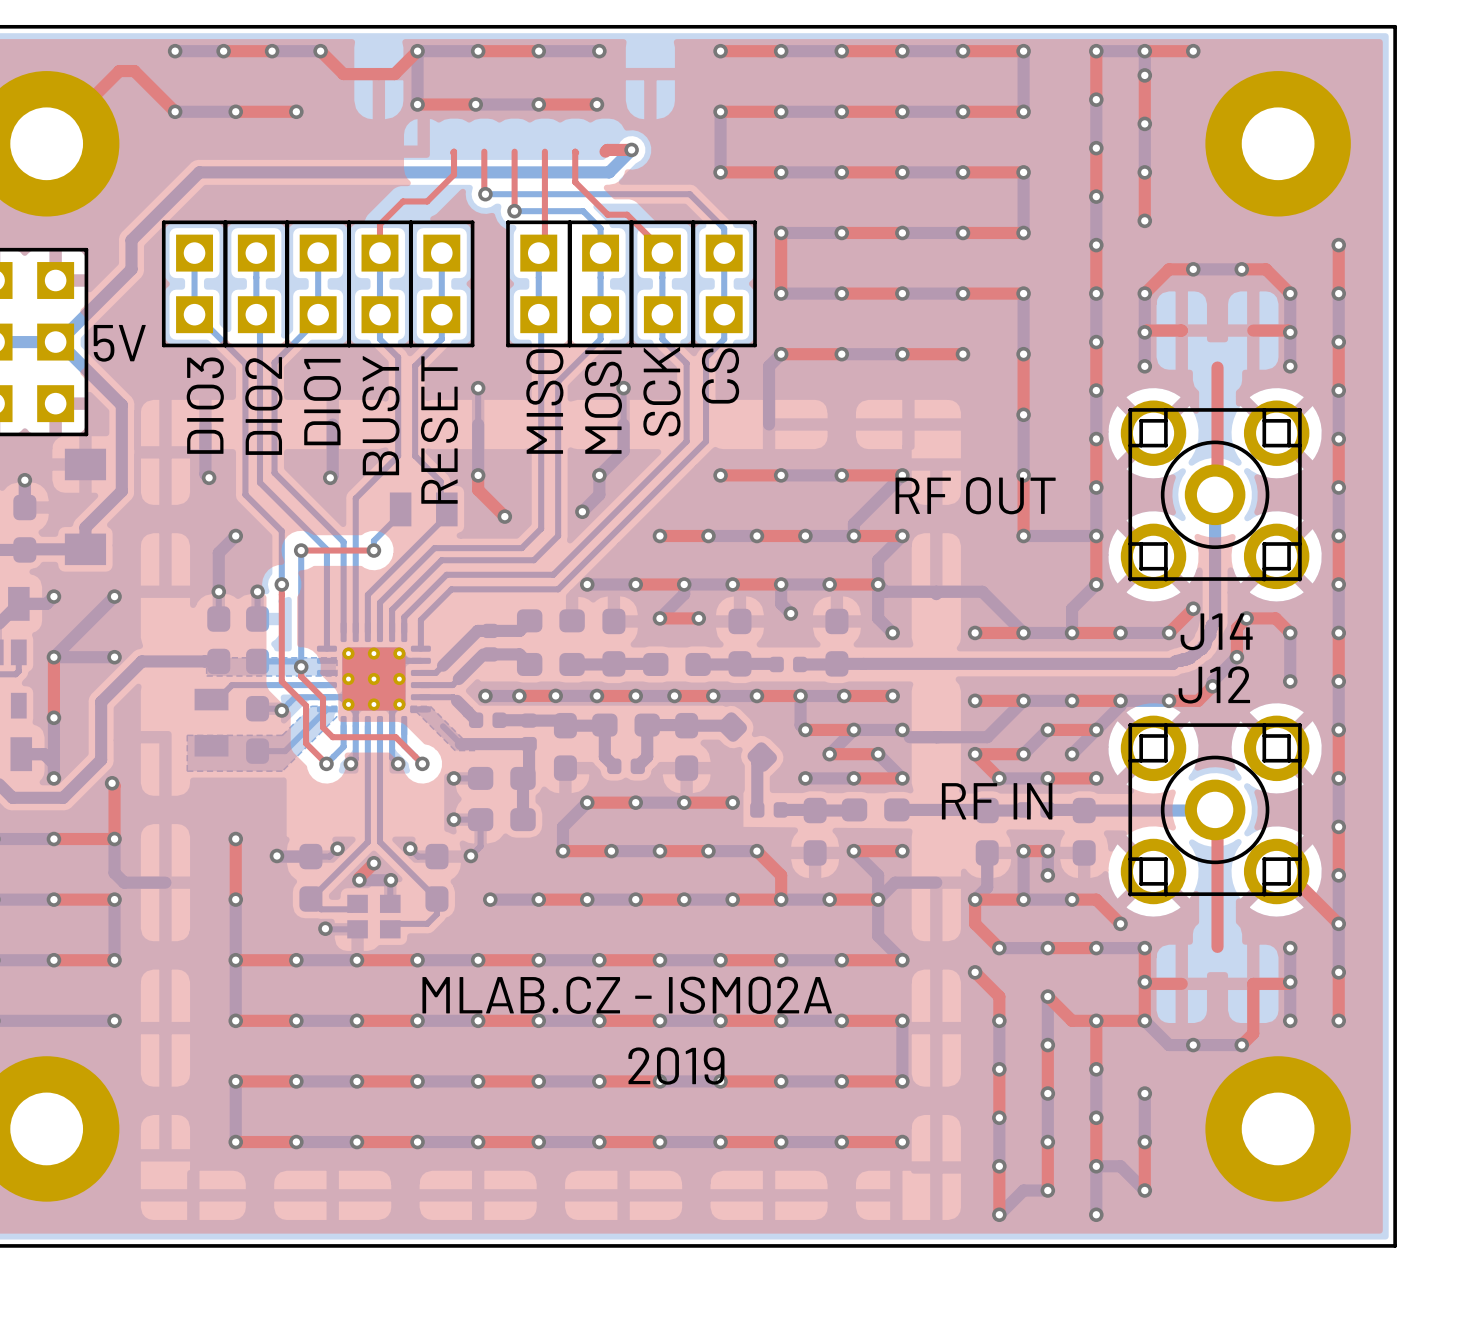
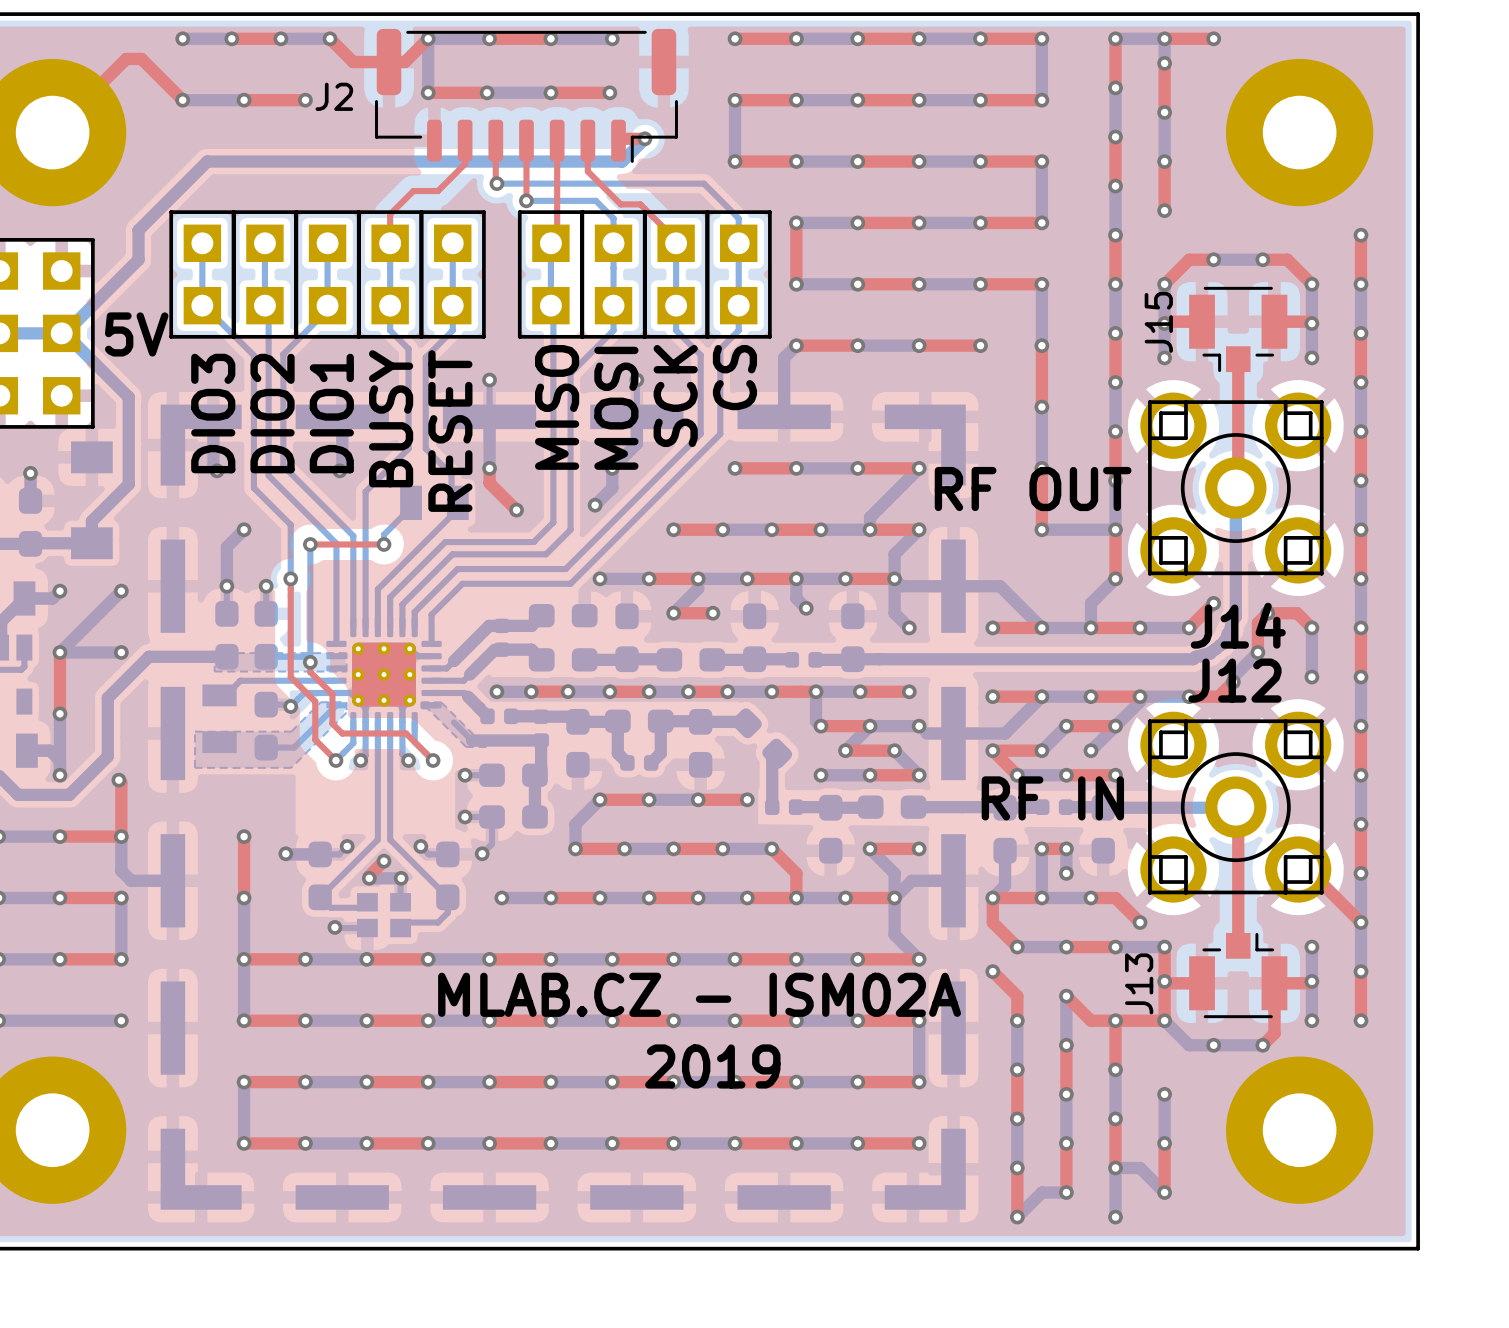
J2: none -> (526, 95)
J15: none -> (1238, 329)
part: none -> (563, 807)
J13: none -> (1238, 975)

